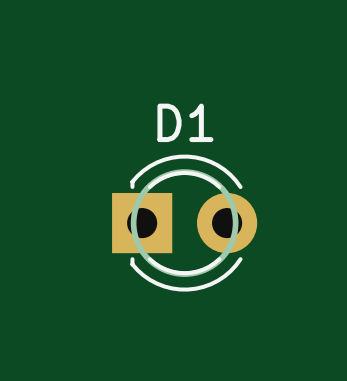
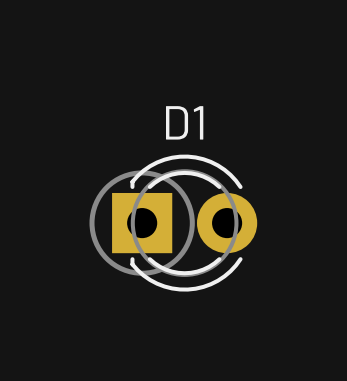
D1 footprint: [112, 154, 258, 292] -> [89, 154, 258, 292]

